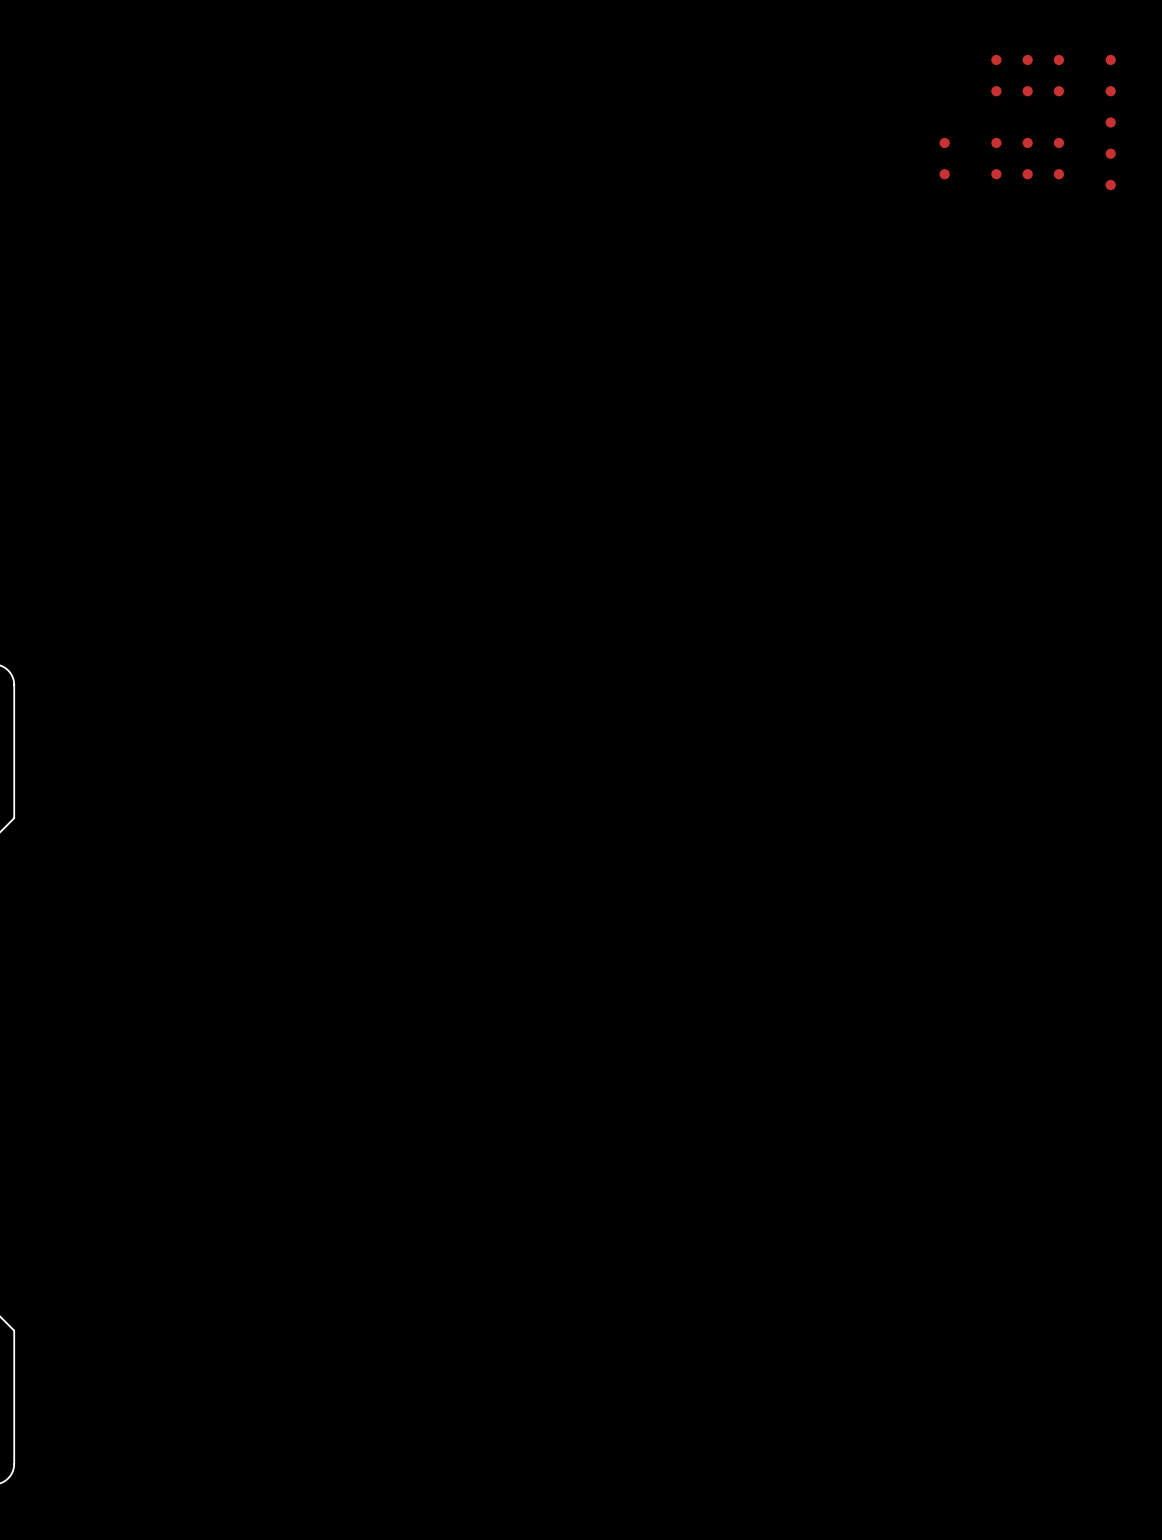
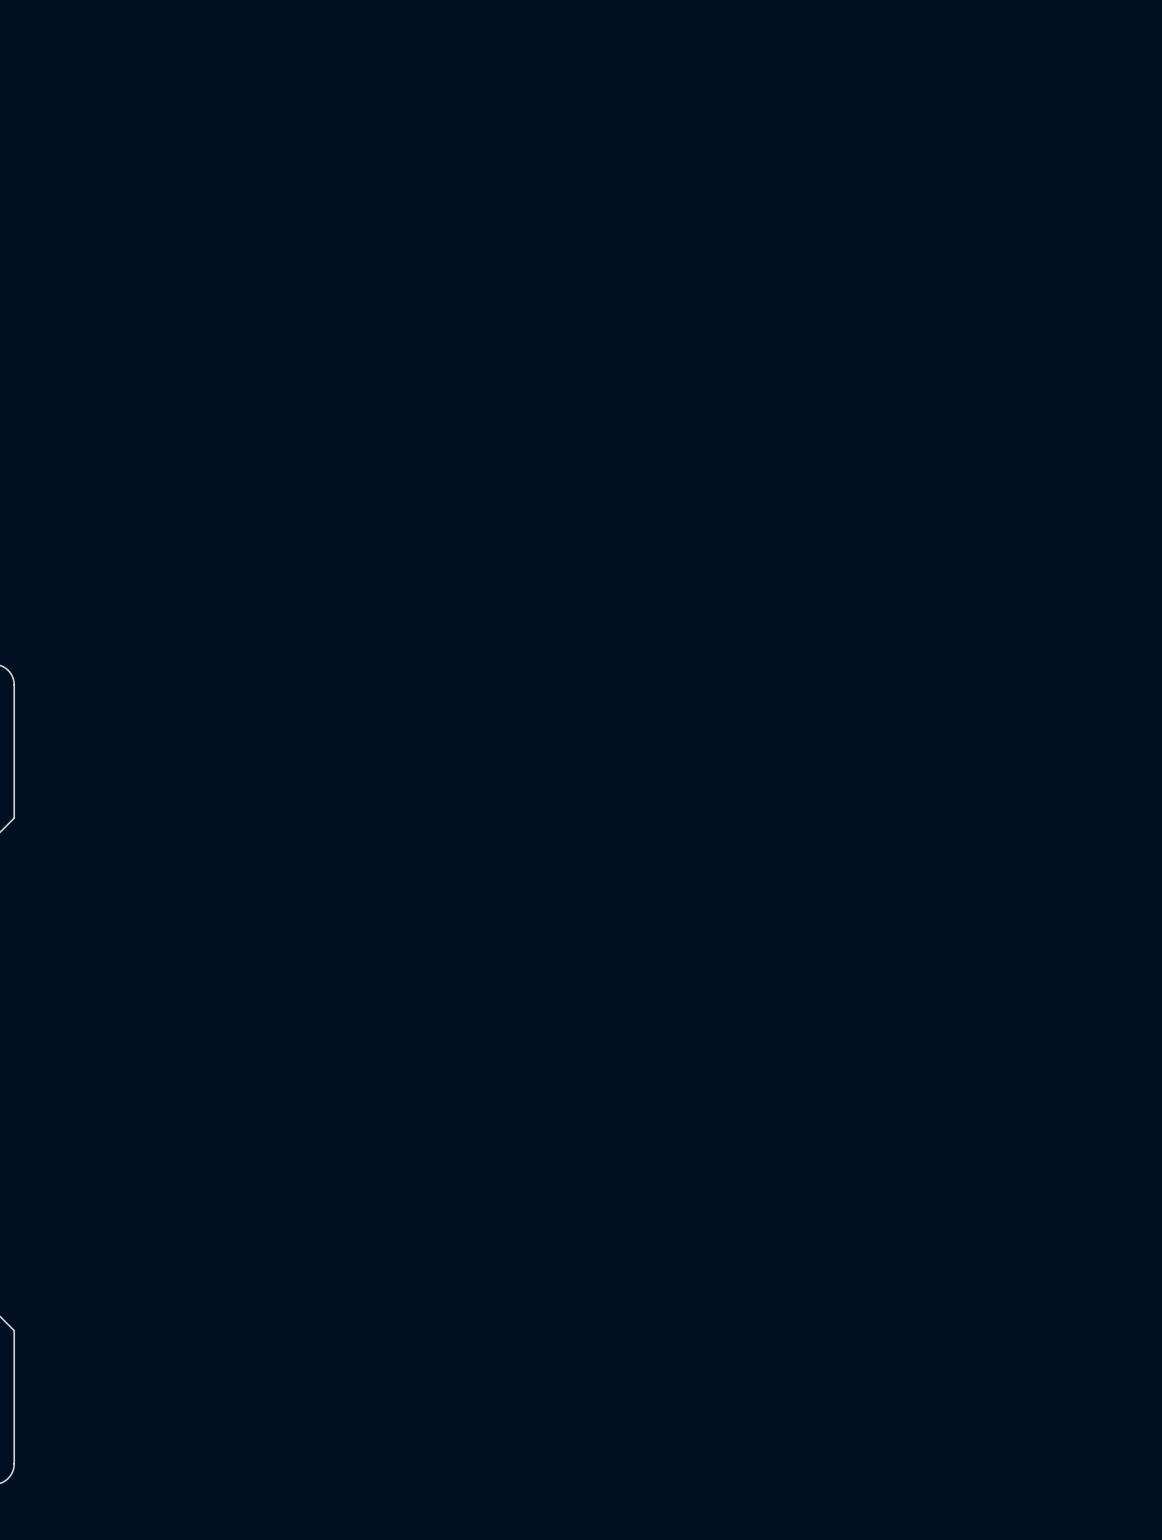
part: (996, 59) -> none
part: (1027, 59) -> none
part: (1058, 59) -> none
part: (1110, 59) -> none
part: (996, 91) -> none
part: (1027, 91) -> none
part: (1058, 91) -> none
part: (1110, 91) -> none
part: (1110, 122) -> none
part: (944, 142) -> none
part: (996, 142) -> none
part: (1027, 142) -> none
part: (1058, 142) -> none
part: (1110, 153) -> none
part: (944, 174) -> none
part: (996, 174) -> none
part: (1027, 174) -> none
part: (1058, 174) -> none
part: (1110, 184) -> none

